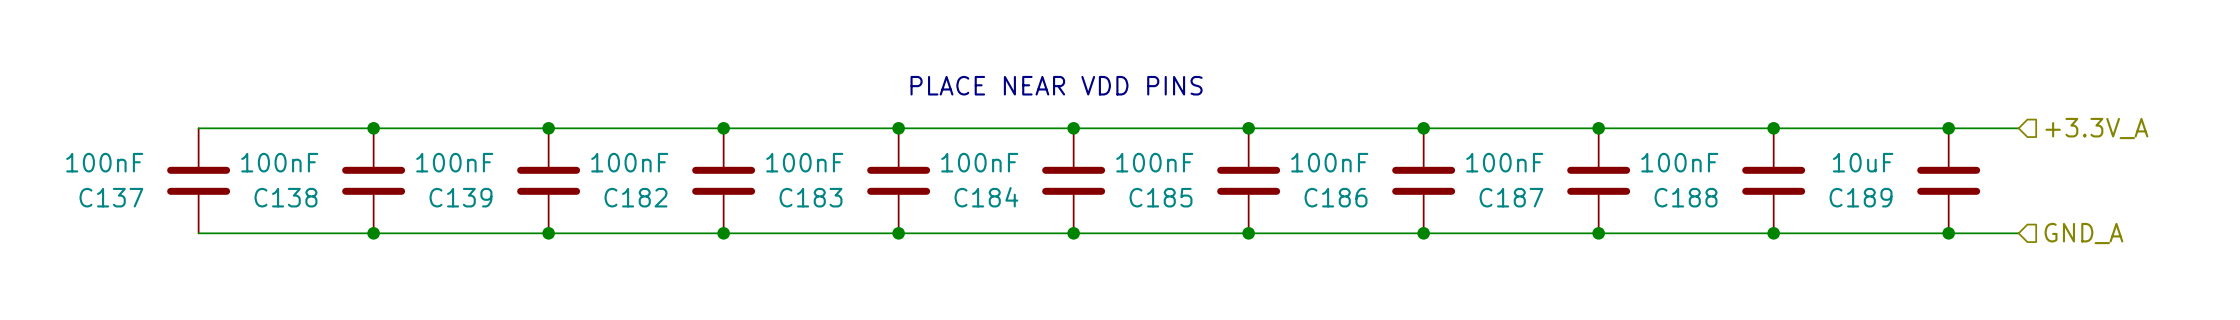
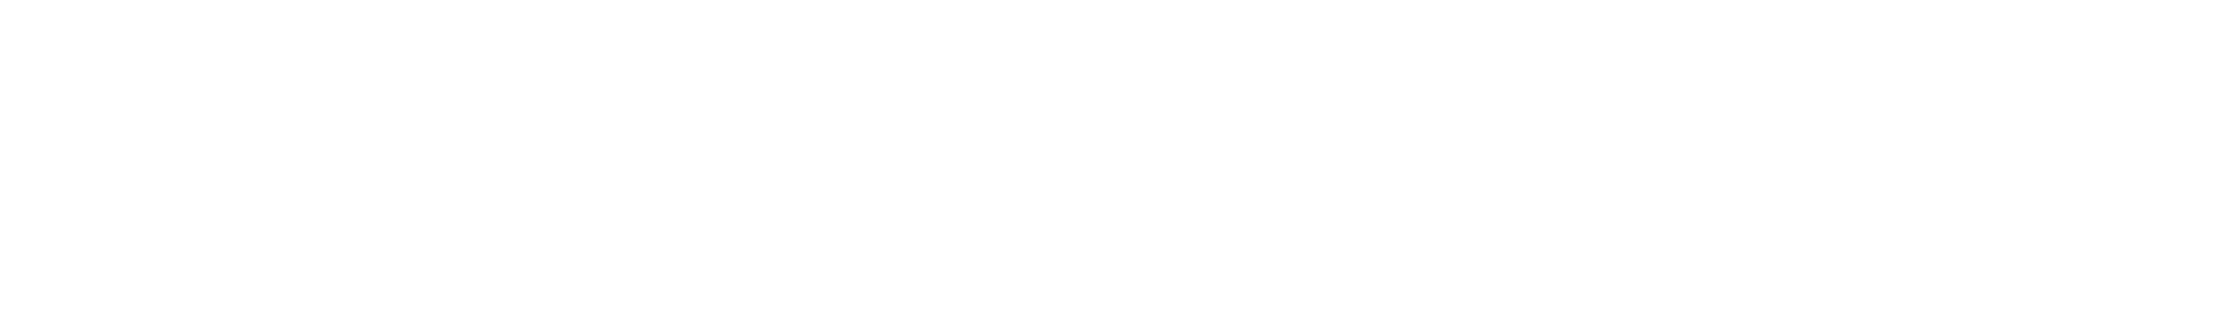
text: PLACE NEAR VDD PINS (1056, 85) -> none
wire: (198, 128) (2018, 128) -> none
junction: (373, 128) -> none
junction: (548, 128) -> none
junction: (723, 128) -> none
junction: (898, 128) -> none
junction: (1073, 128) -> none
junction: (1248, 128) -> none
junction: (1423, 128) -> none
junction: (1598, 128) -> none
junction: (1773, 128) -> none
junction: (1948, 128) -> none
hierarchical label: +3.3V_A (2096, 128) -> none
C137: 100nF (198, 180) -> none
C138: 100nF (373, 180) -> none
C139: 100nF (548, 180) -> none
C182: 100nF (723, 180) -> none
C183: 100nF (898, 180) -> none
C184: 100nF (1073, 180) -> none
C185: 100nF (1248, 180) -> none
C186: 100nF (1423, 180) -> none
C187: 100nF (1598, 180) -> none
C188: 100nF (1773, 180) -> none
C189: 10uF (1948, 180) -> none
wire: (198, 233) (2018, 233) -> none
junction: (373, 233) -> none
junction: (548, 233) -> none
junction: (723, 233) -> none
junction: (898, 233) -> none
junction: (1073, 233) -> none
junction: (1248, 233) -> none
junction: (1423, 233) -> none
junction: (1598, 233) -> none
junction: (1773, 233) -> none
junction: (1948, 233) -> none
hierarchical label: GND_A (2083, 233) -> none

